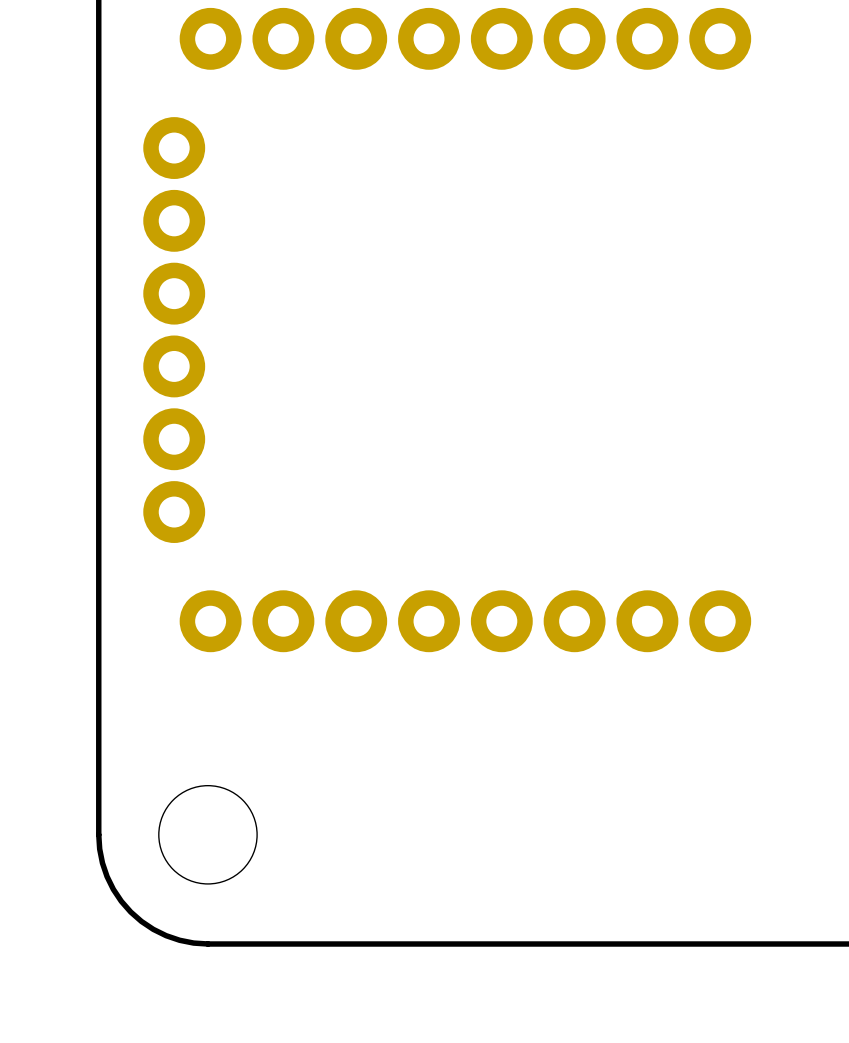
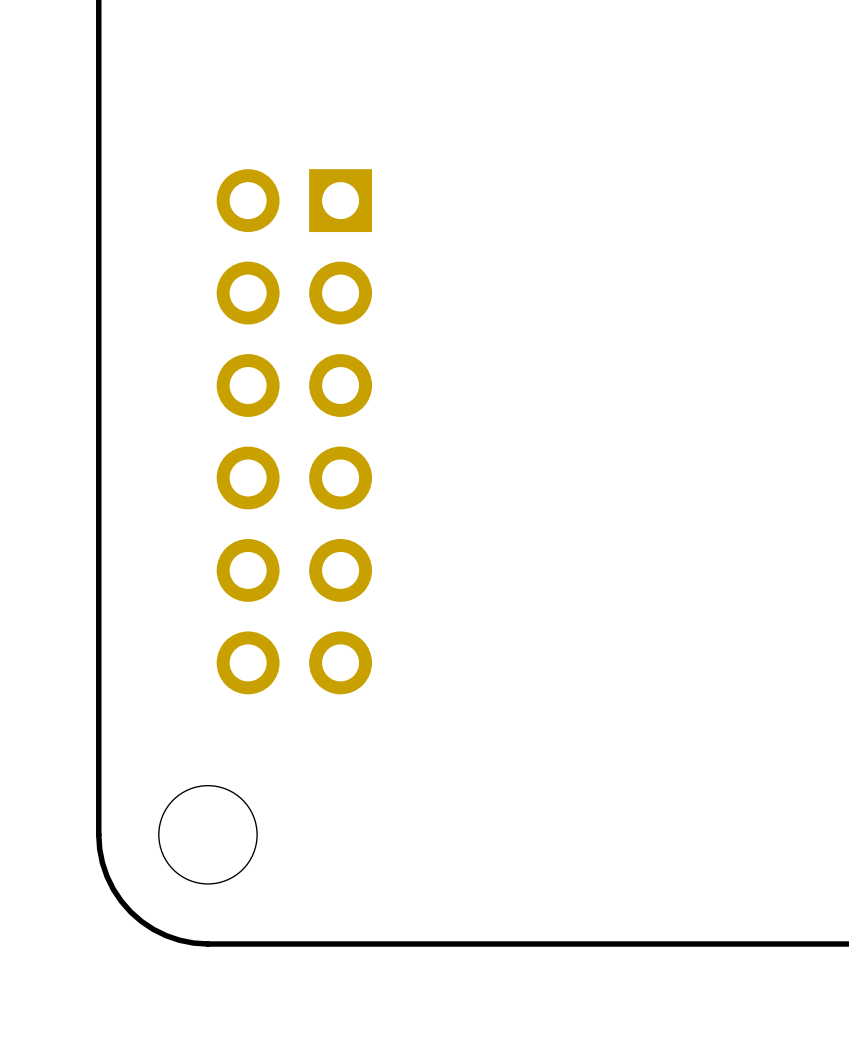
part: (447, 330) -> none
part: none -> (294, 431)

